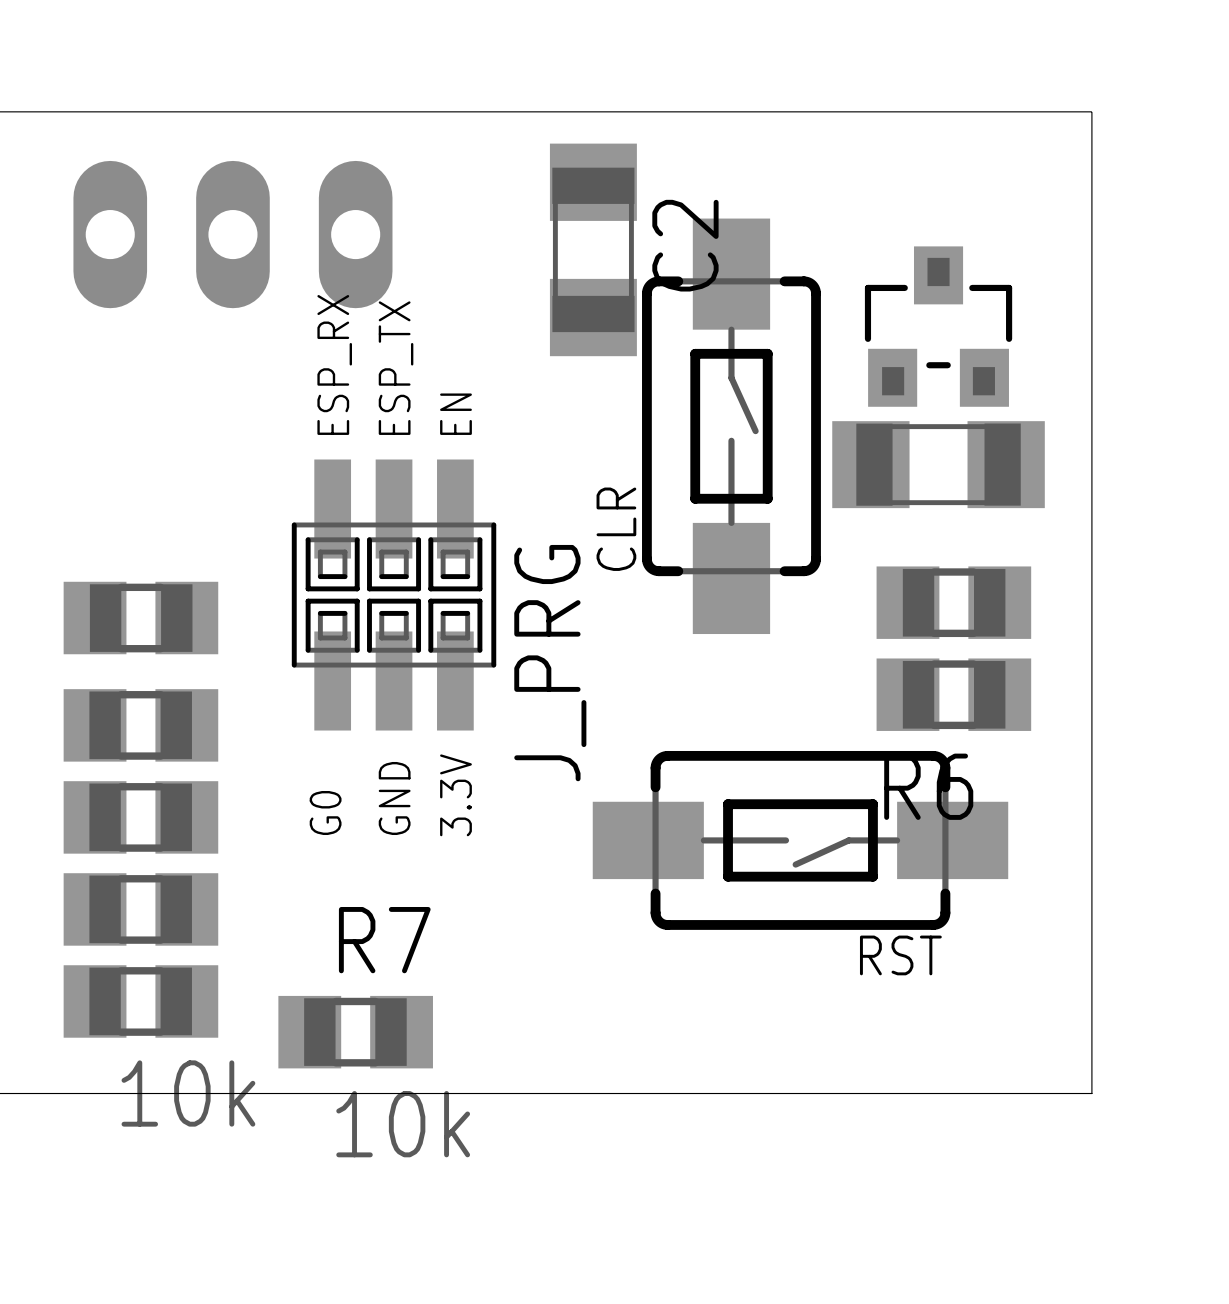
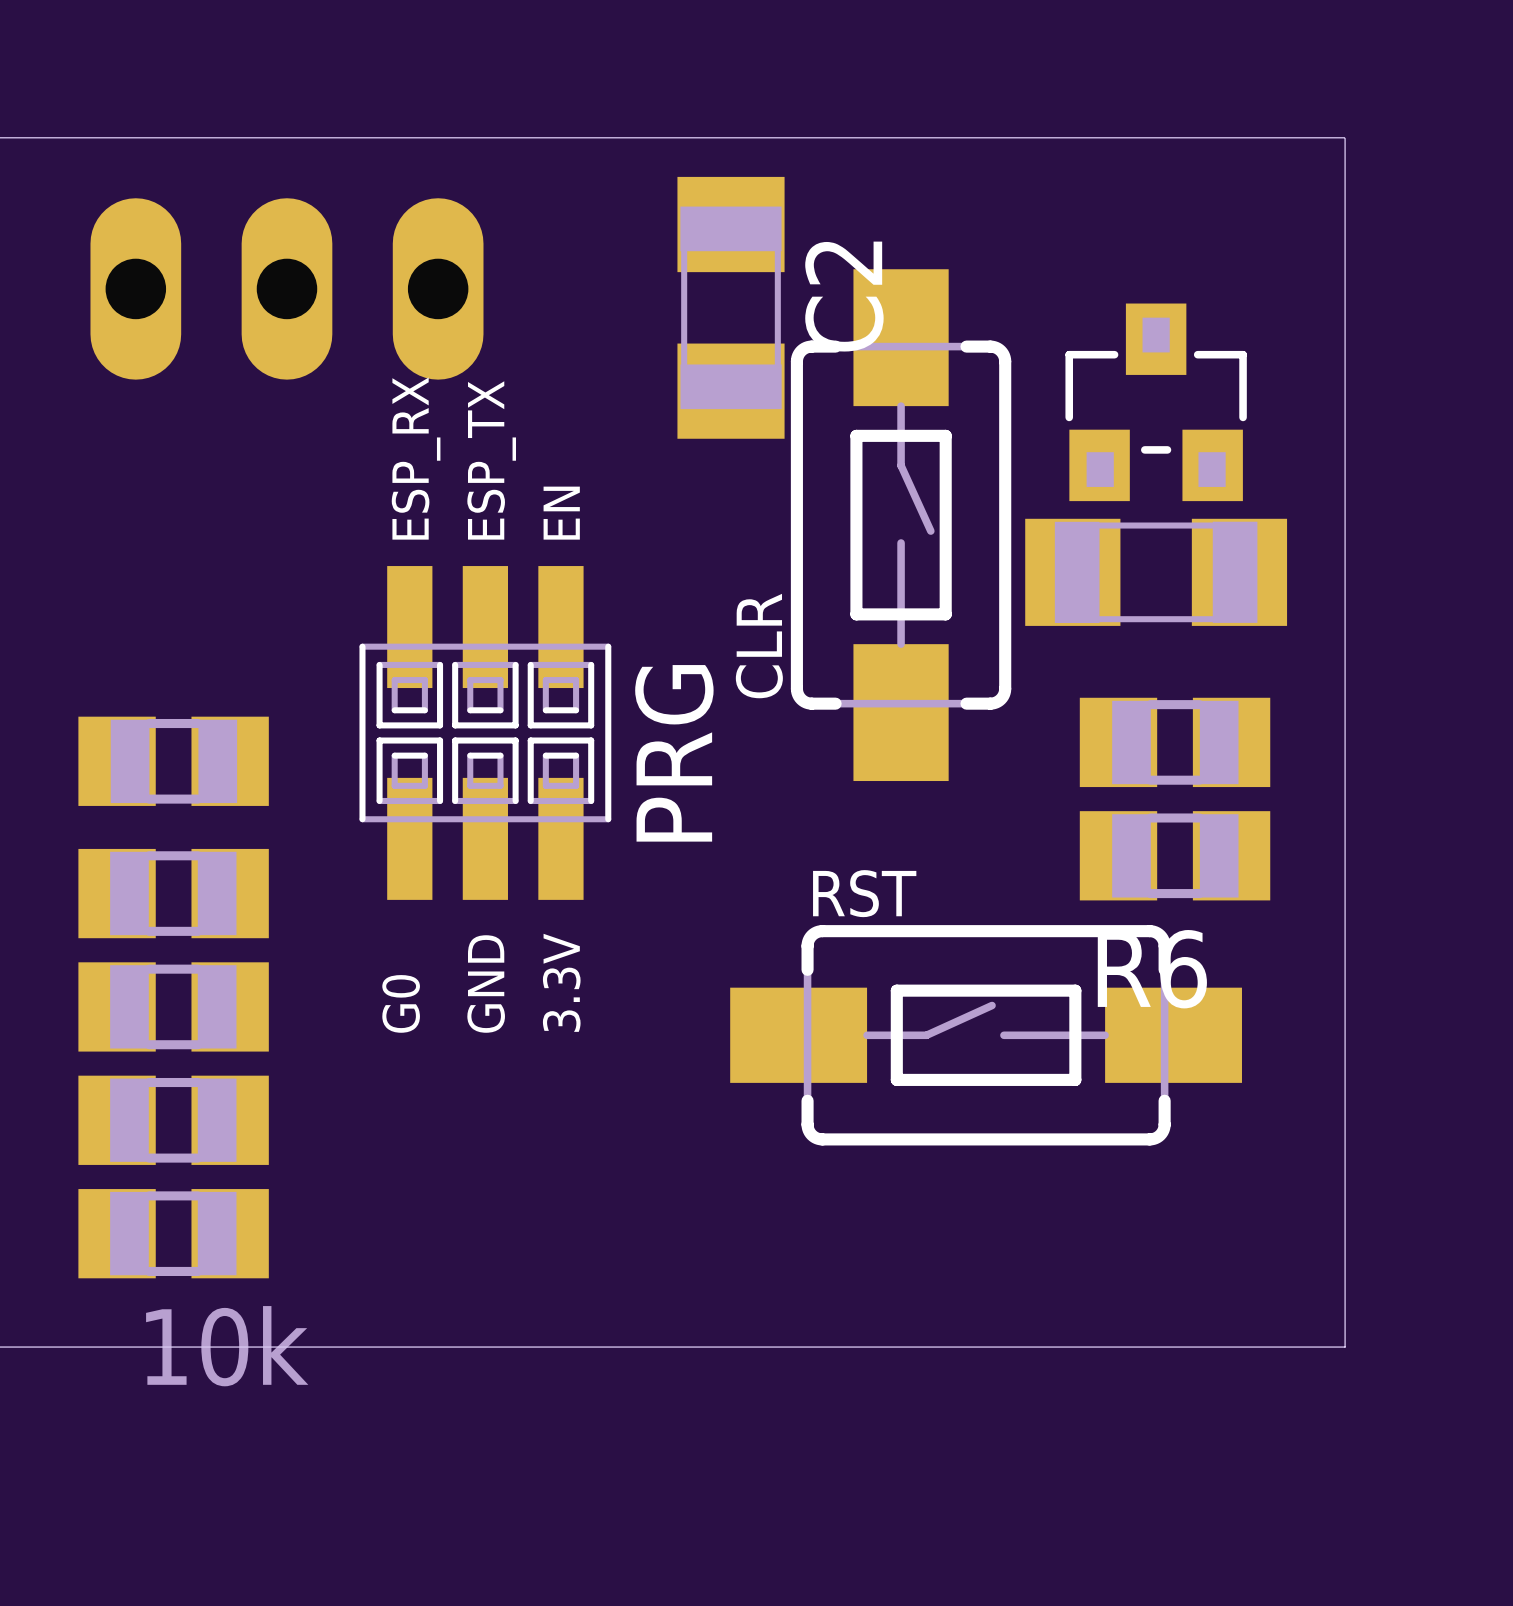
J_PRG name: J_PRG (550, 663) -> PRG (674, 753)
RST rotation: 0° (800, 840) -> 180° (986, 1035)
R7: 10k (355, 1032) -> none

